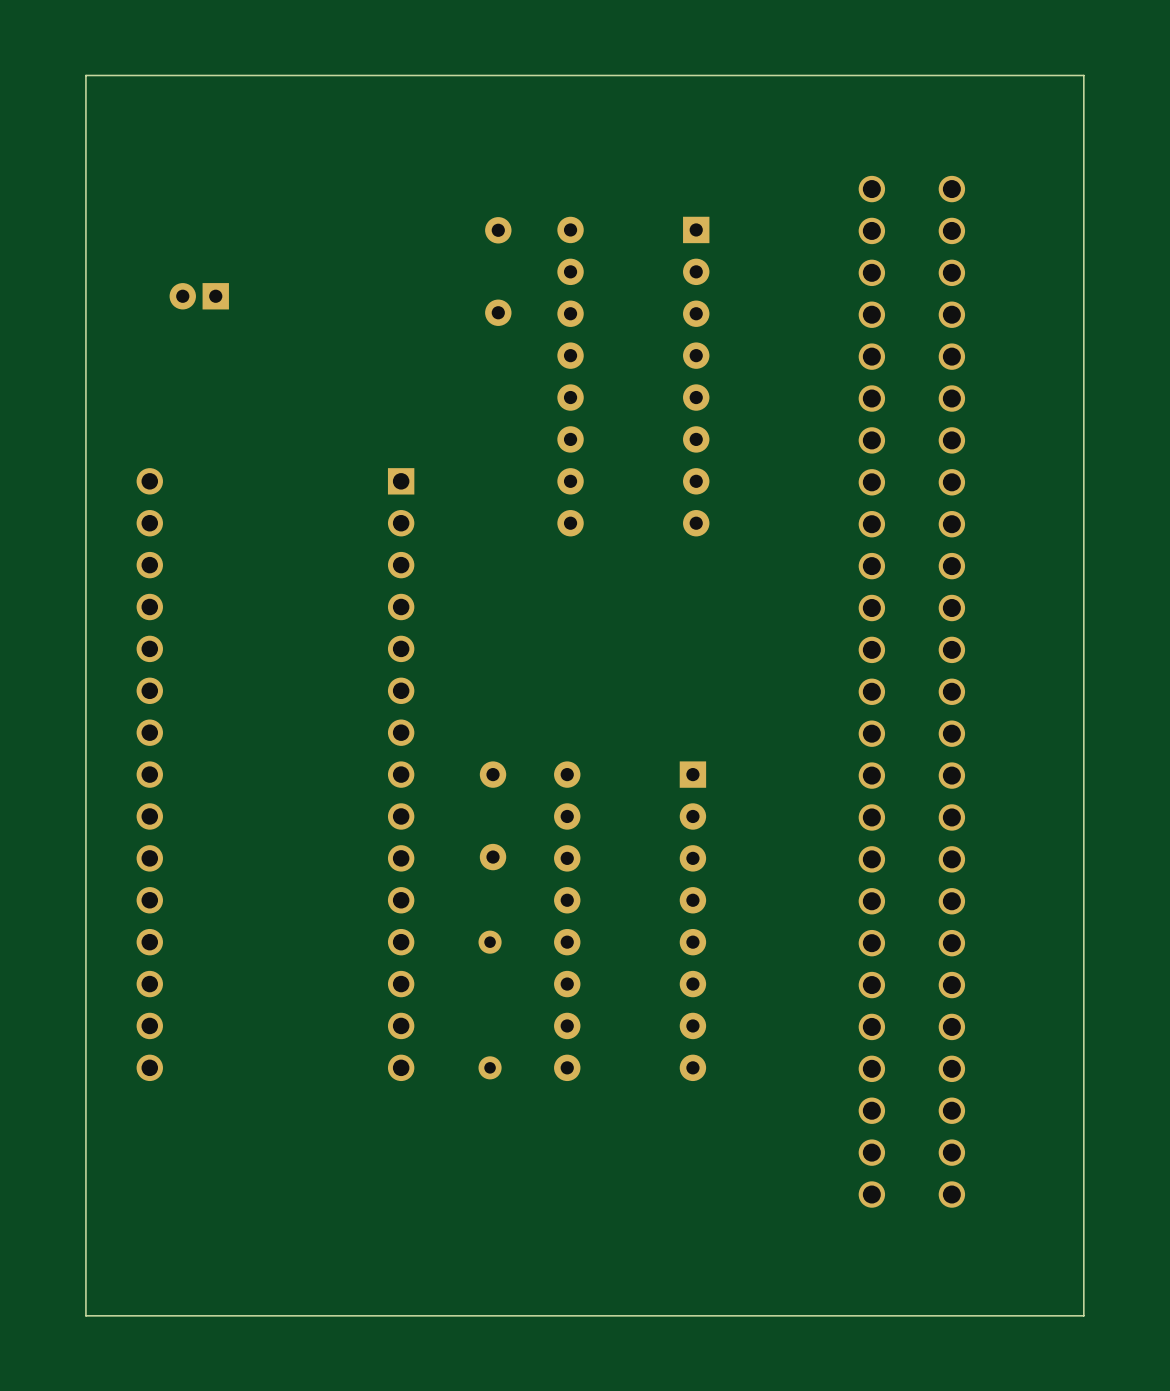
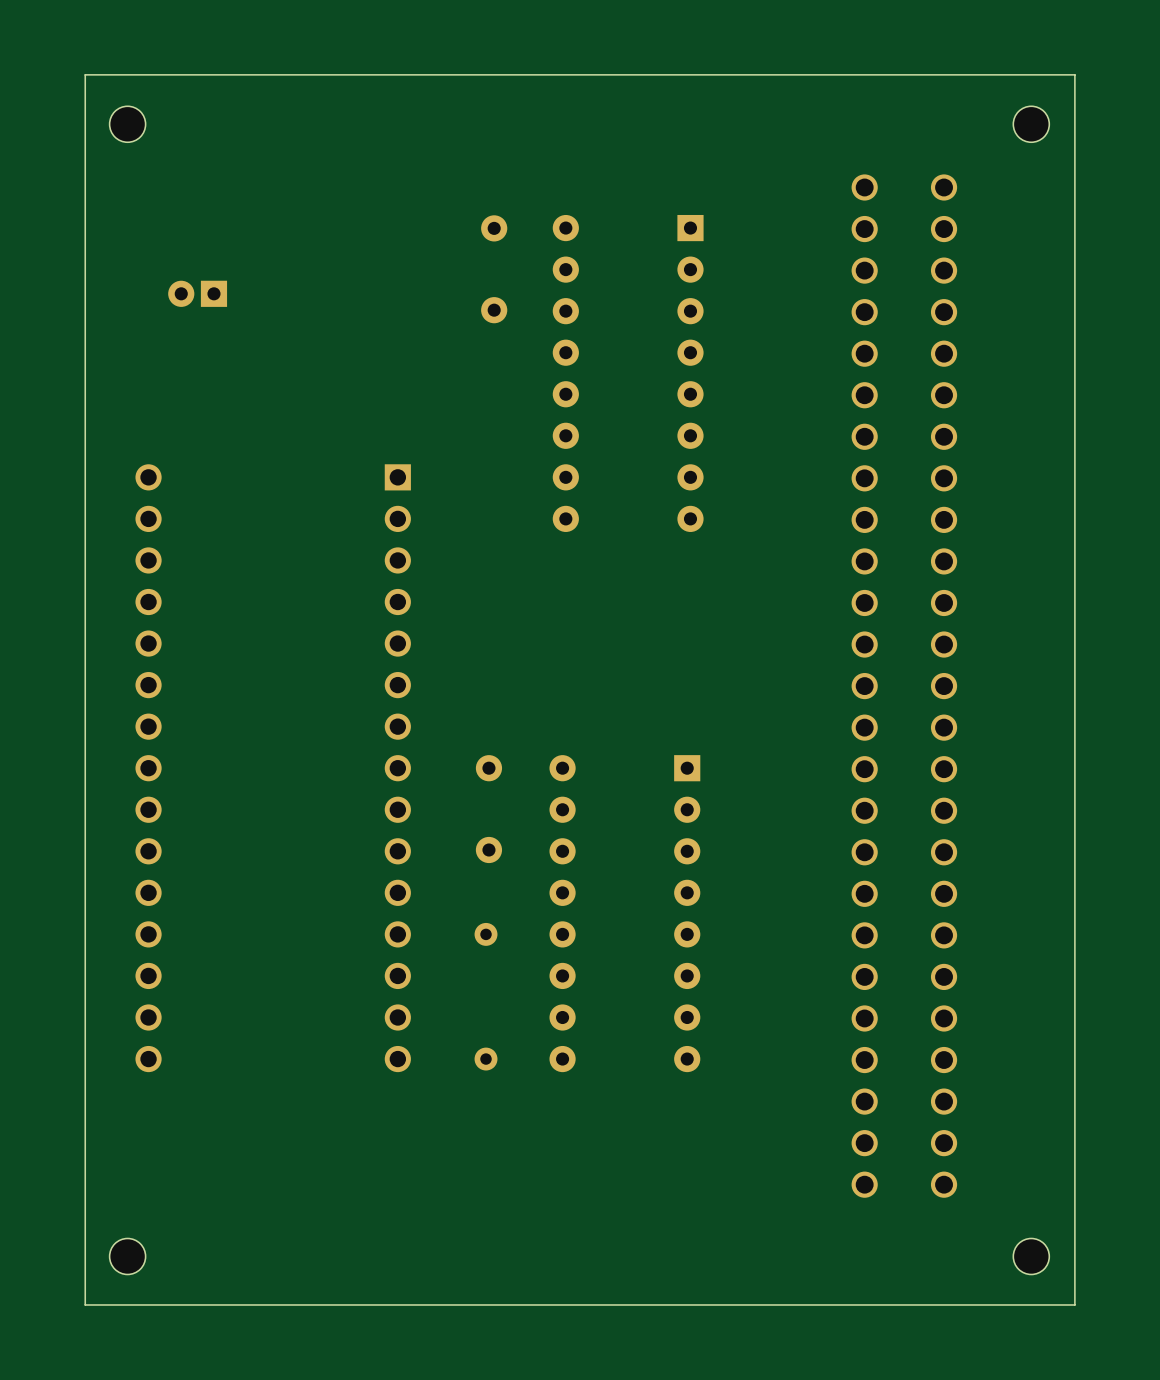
part: none -> (127, 124)
part: none -> (1031, 124)
part: none -> (127, 1256)
part: none -> (1031, 1256)

